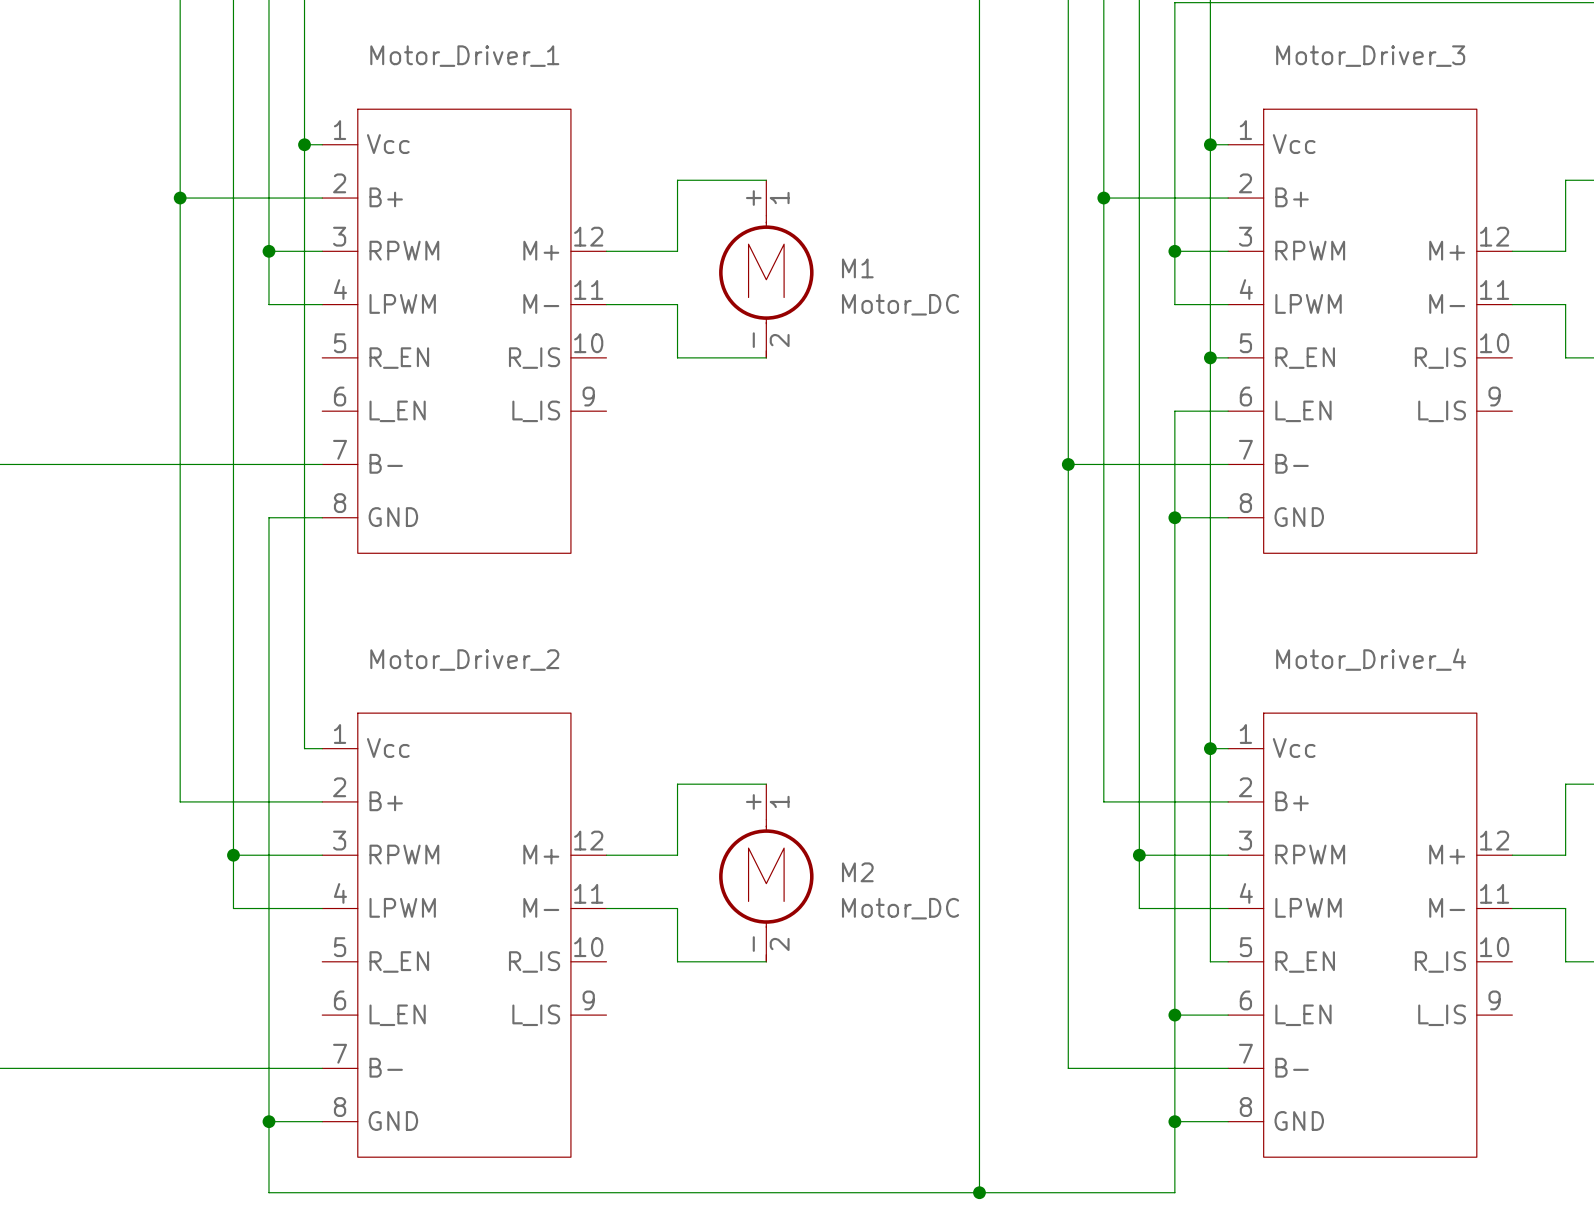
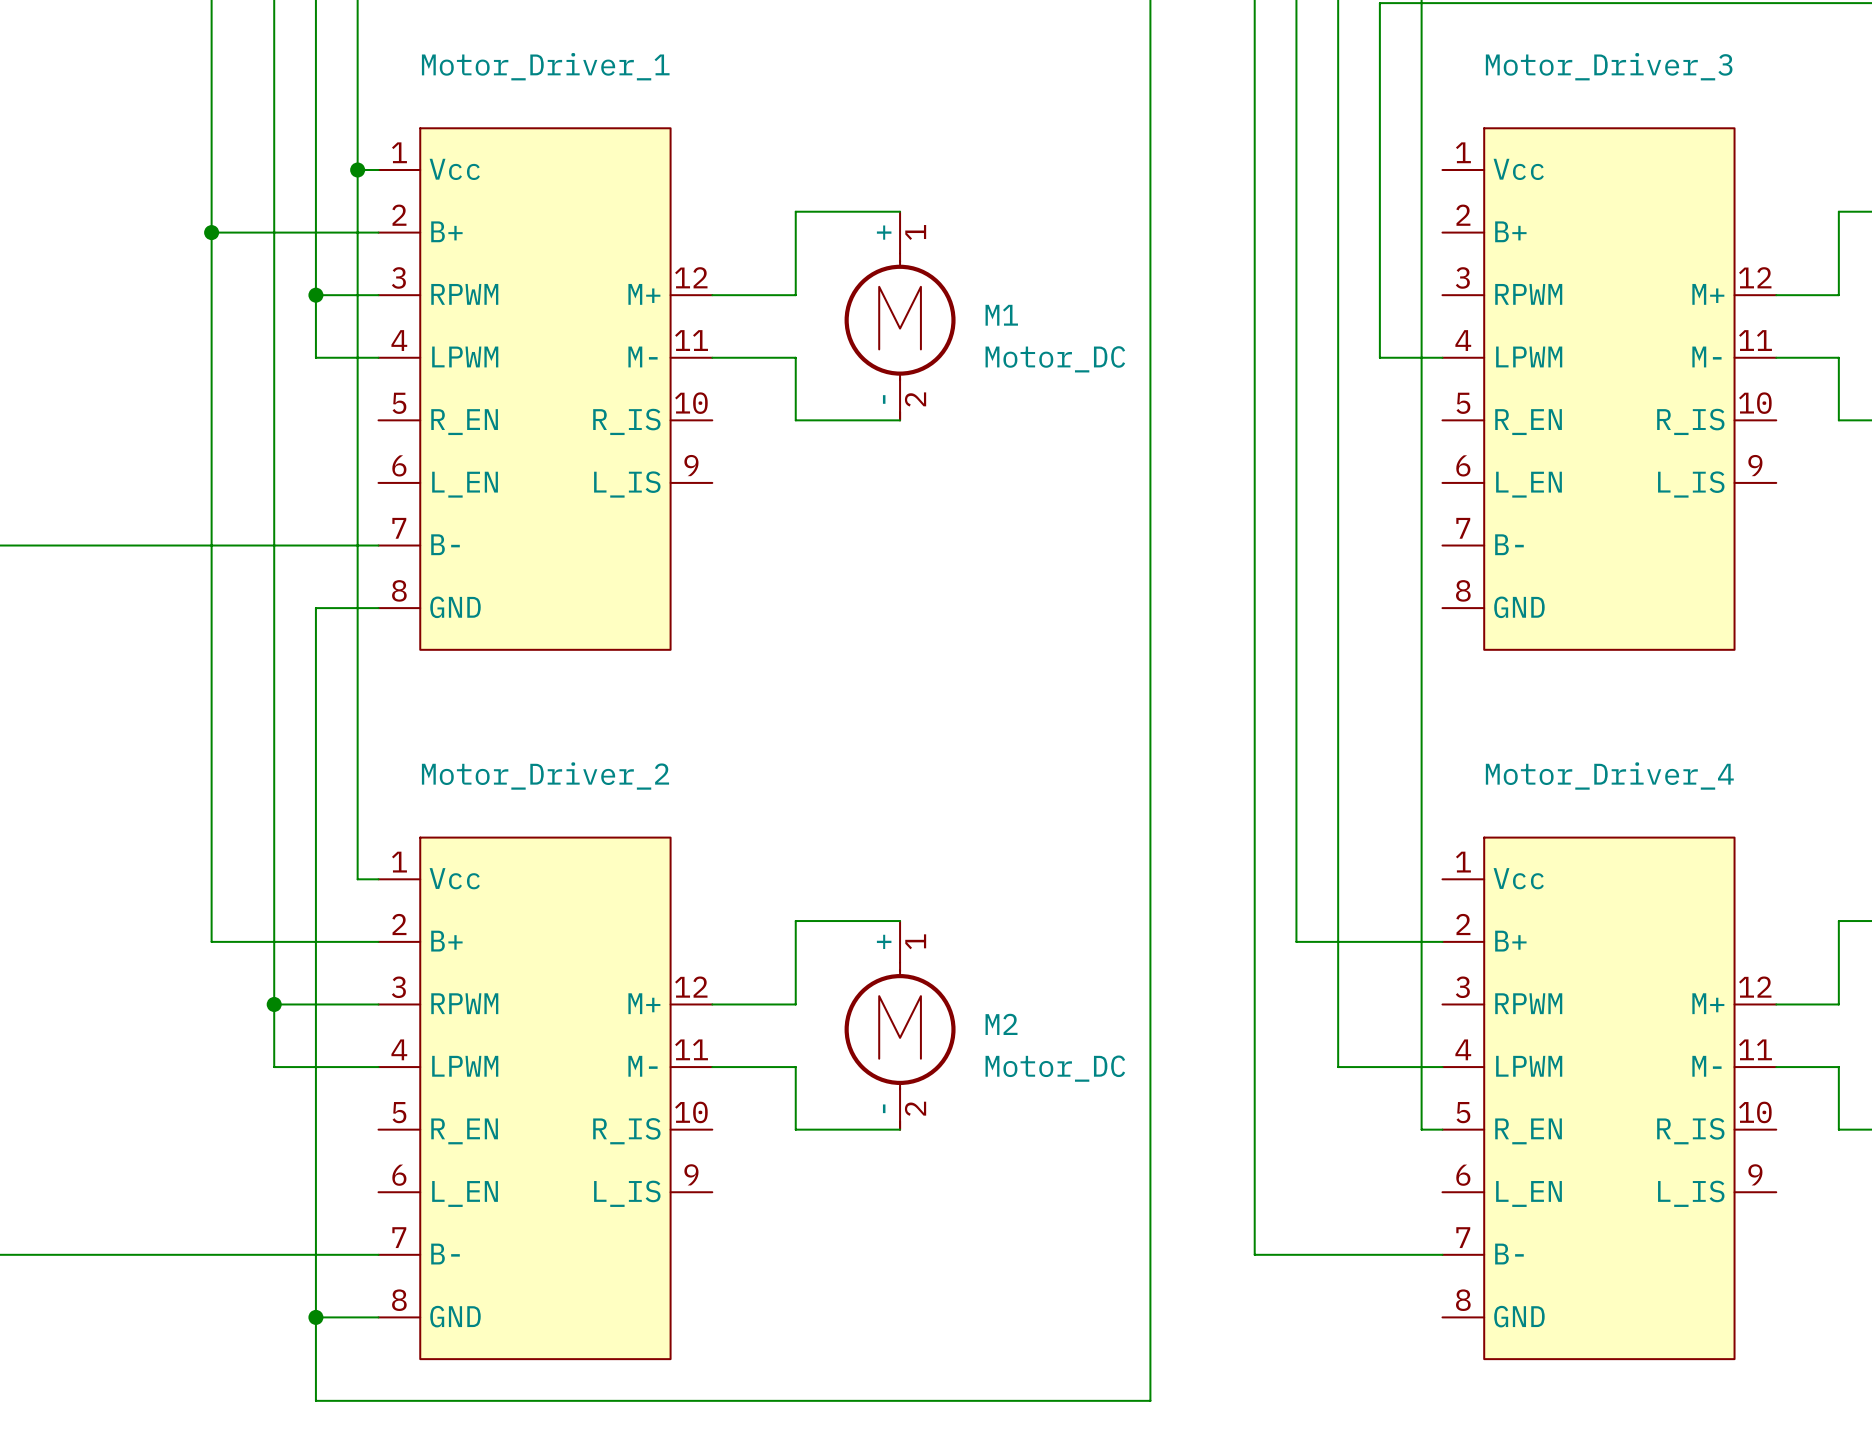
wire: (1210, 144) (1228, 144) -> none
junction: (1210, 144) -> none
wire: (1103, 198) (1228, 198) -> none
junction: (1103, 198) -> none
wire: (1174, 251) (1228, 251) -> none
junction: (1174, 251) -> none
wire: (1210, 357) (1228, 357) -> none
junction: (1210, 357) -> none
wire: (1228, 411) (1174, 411) (1174, 1192) (979, 1192) -> none
wire: (1068, 464) (1228, 464) -> none
junction: (1068, 464) -> none
wire: (1174, 517) (1228, 517) -> none
junction: (1174, 517) -> none
wire: (1210, 748) (1228, 748) -> none
junction: (1210, 748) -> none
wire: (1139, 855) (1228, 855) -> none
junction: (1139, 855) -> none
wire: (1174, 1015) (1228, 1015) -> none
junction: (1174, 1015) -> none
wire: (1174, 1121) (1228, 1121) -> none
junction: (1174, 1121) -> none
junction: (979, 1192) -> none

